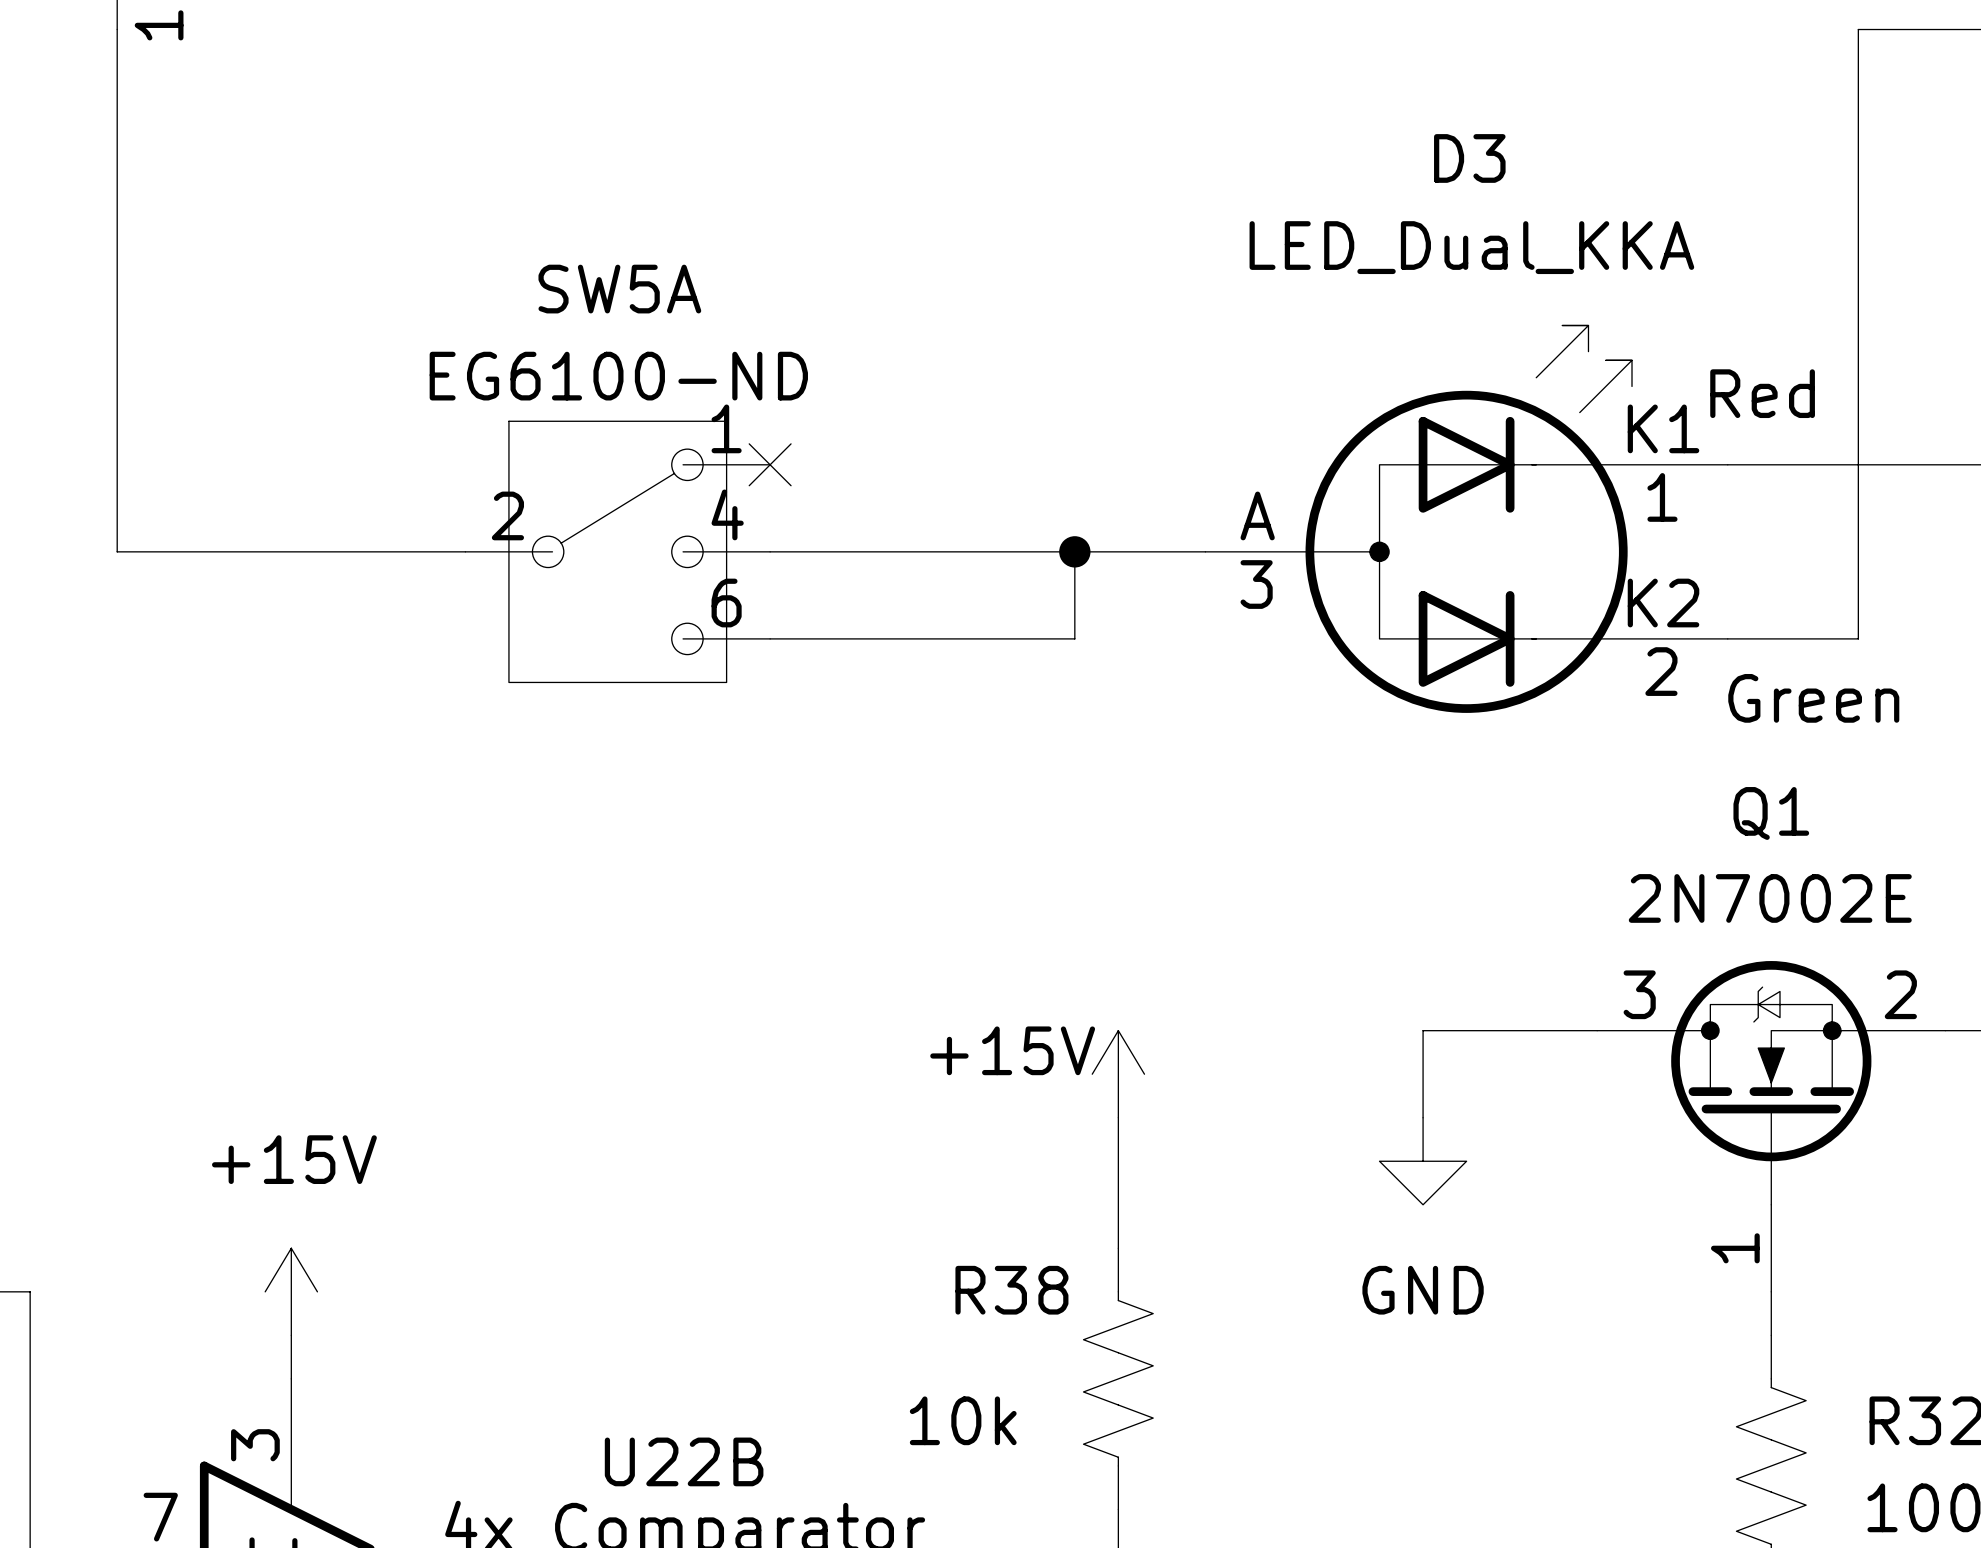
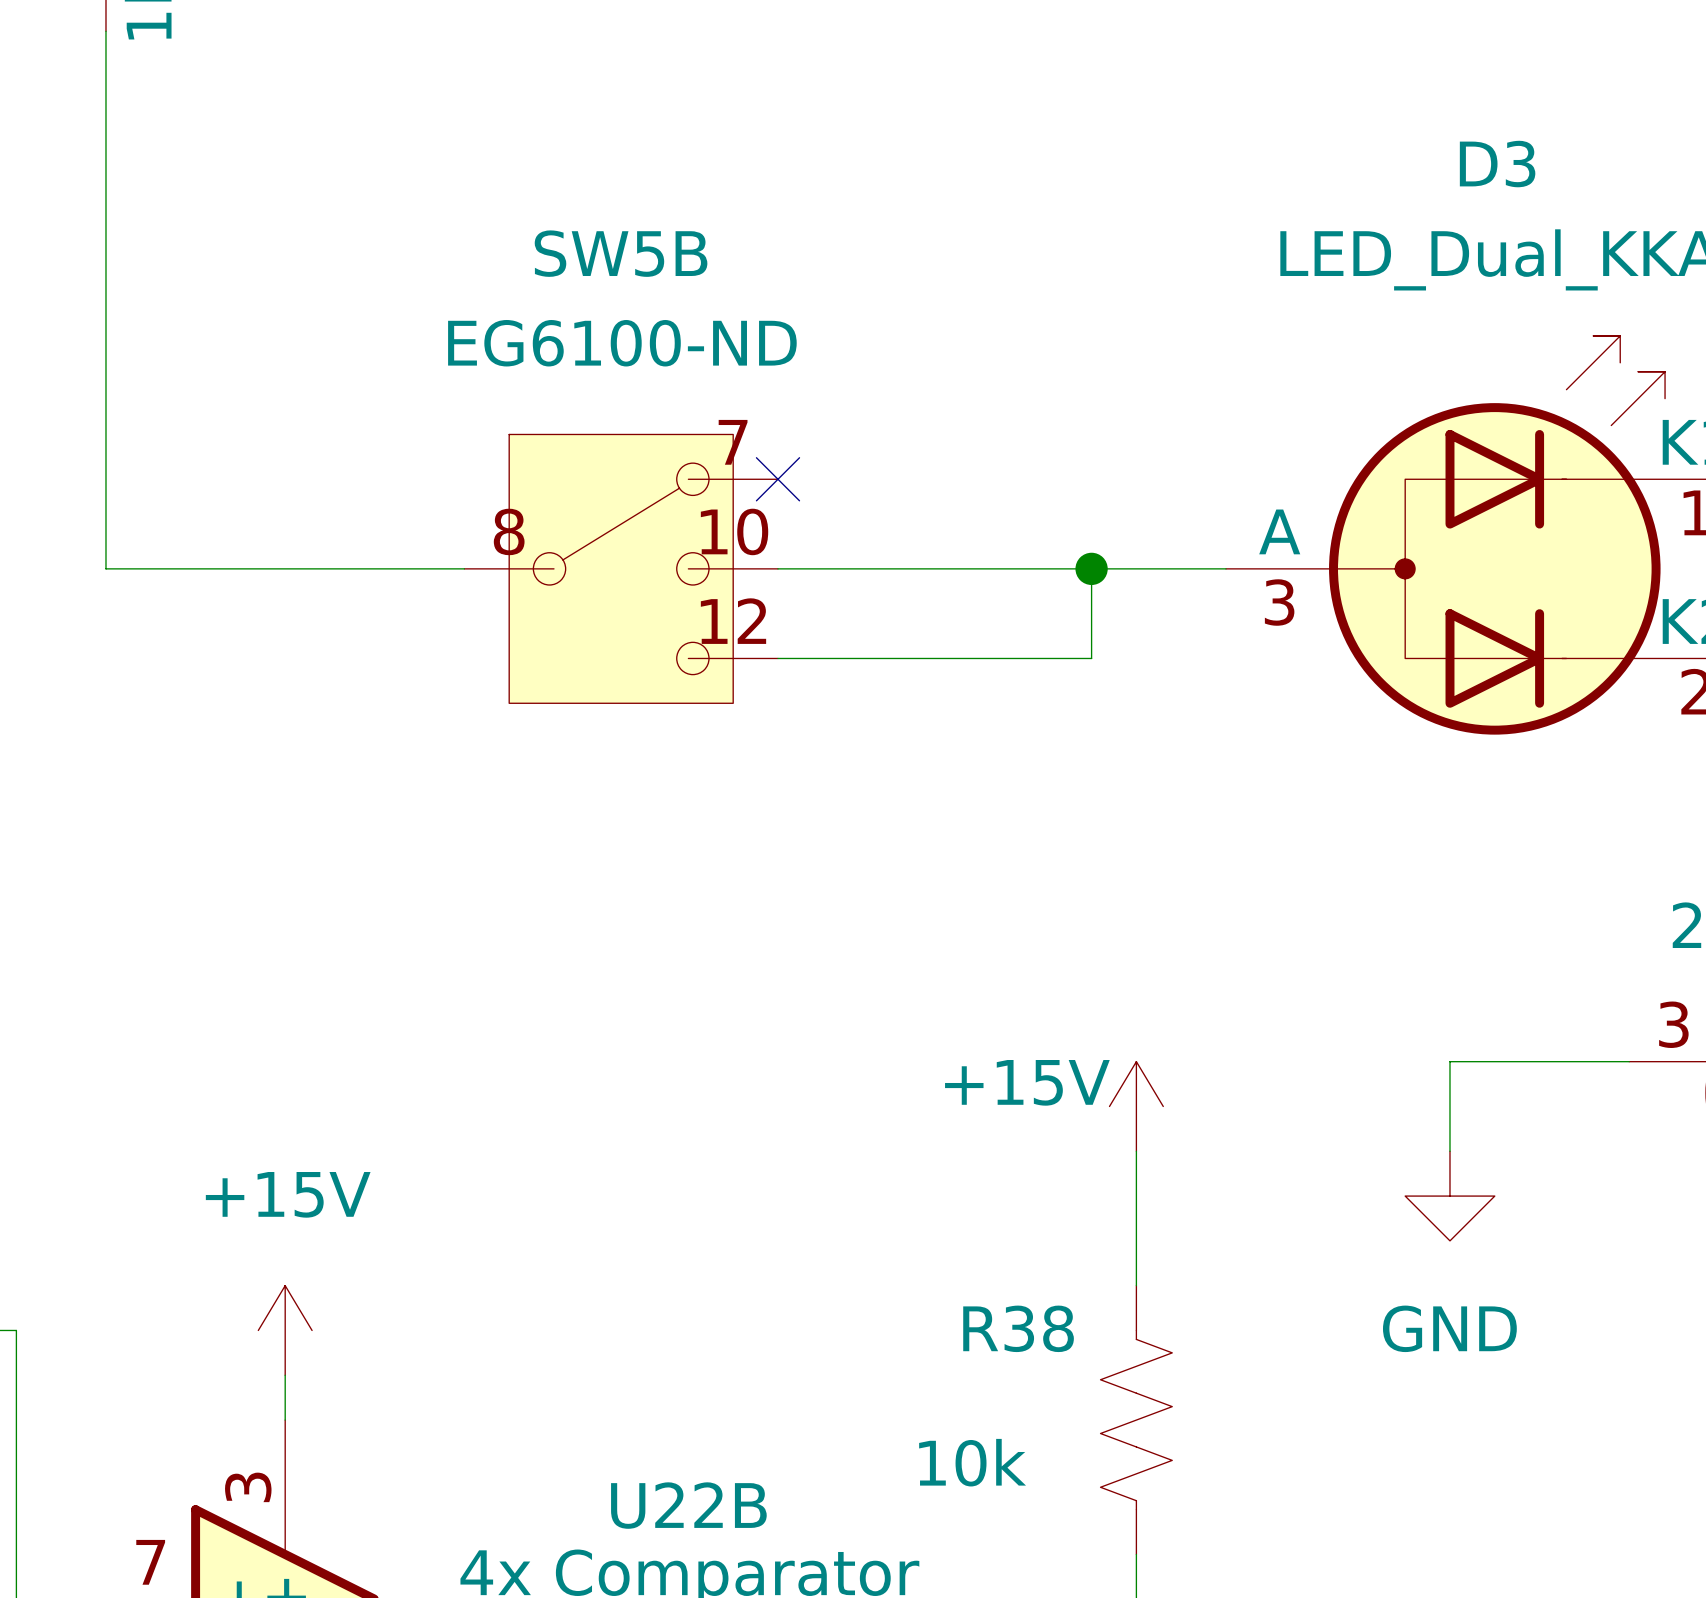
SW5A name: SW5A (619, 289) -> SW5B (621, 253)
SW5A value position: EG6100-ND (618, 376) -> EG6100-ND (622, 343)
SW5A pin number: 1 (726, 428) -> 7 (733, 442)
SW5A pin number: 4 (727, 514) -> 10 (734, 531)
SW5A pin number: 2 (507, 515) -> 8 (509, 531)
SW5A pin number: 6 (726, 603) -> 12 (733, 621)

